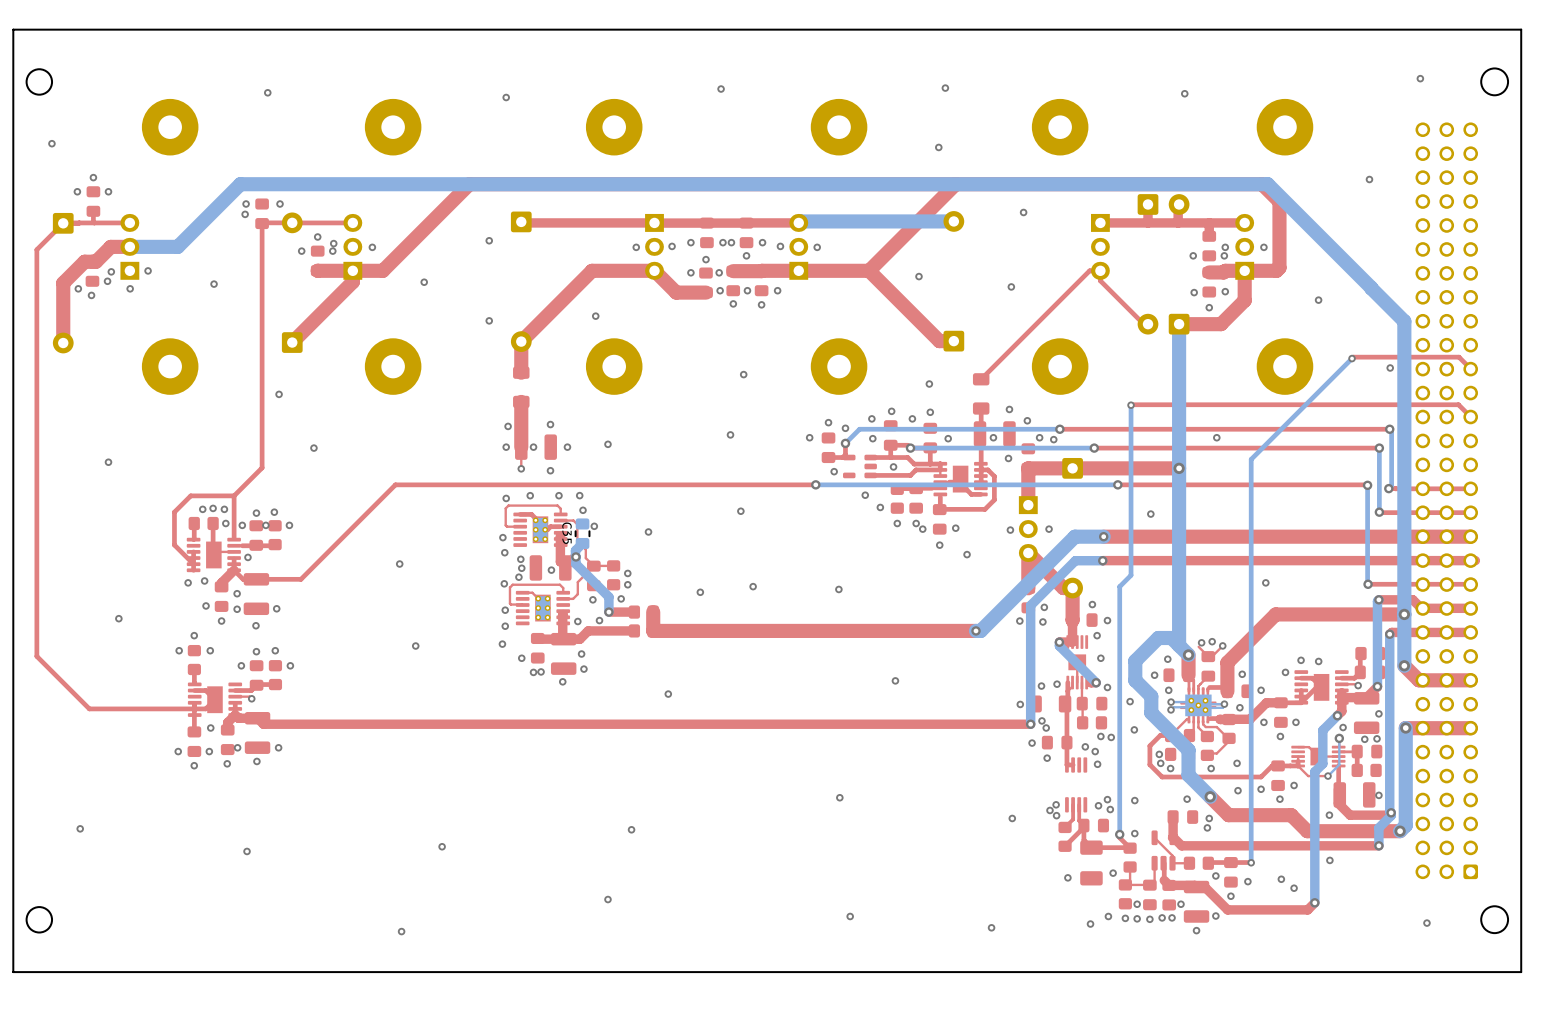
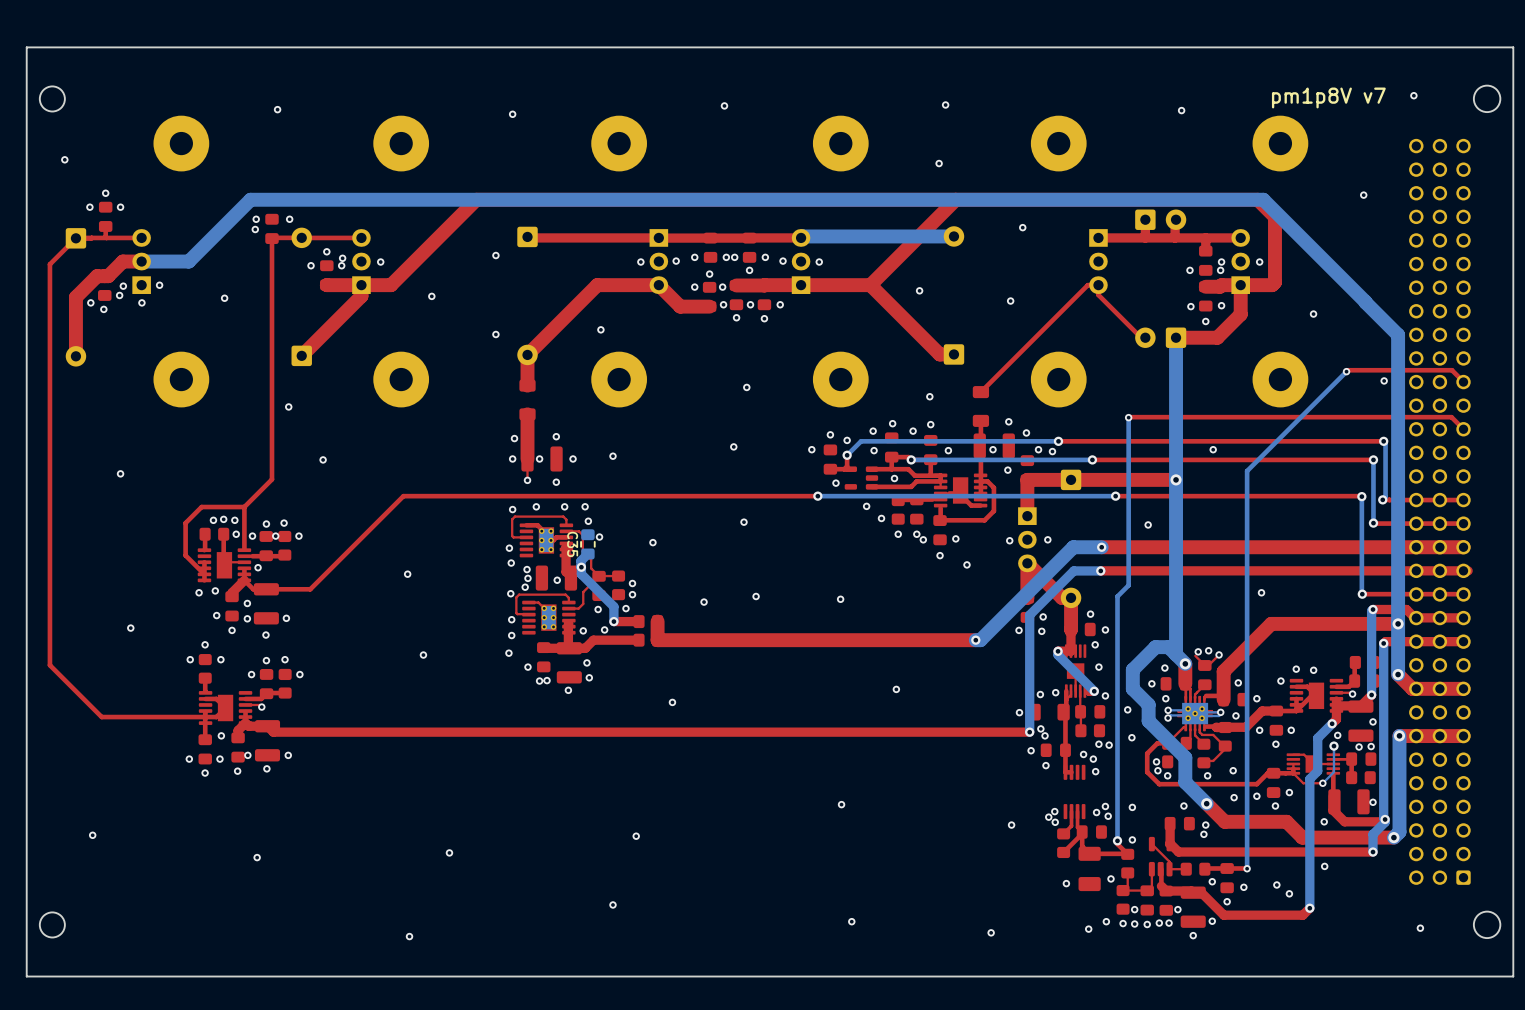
text: none -> pm1p8V v7 (1328, 97)

